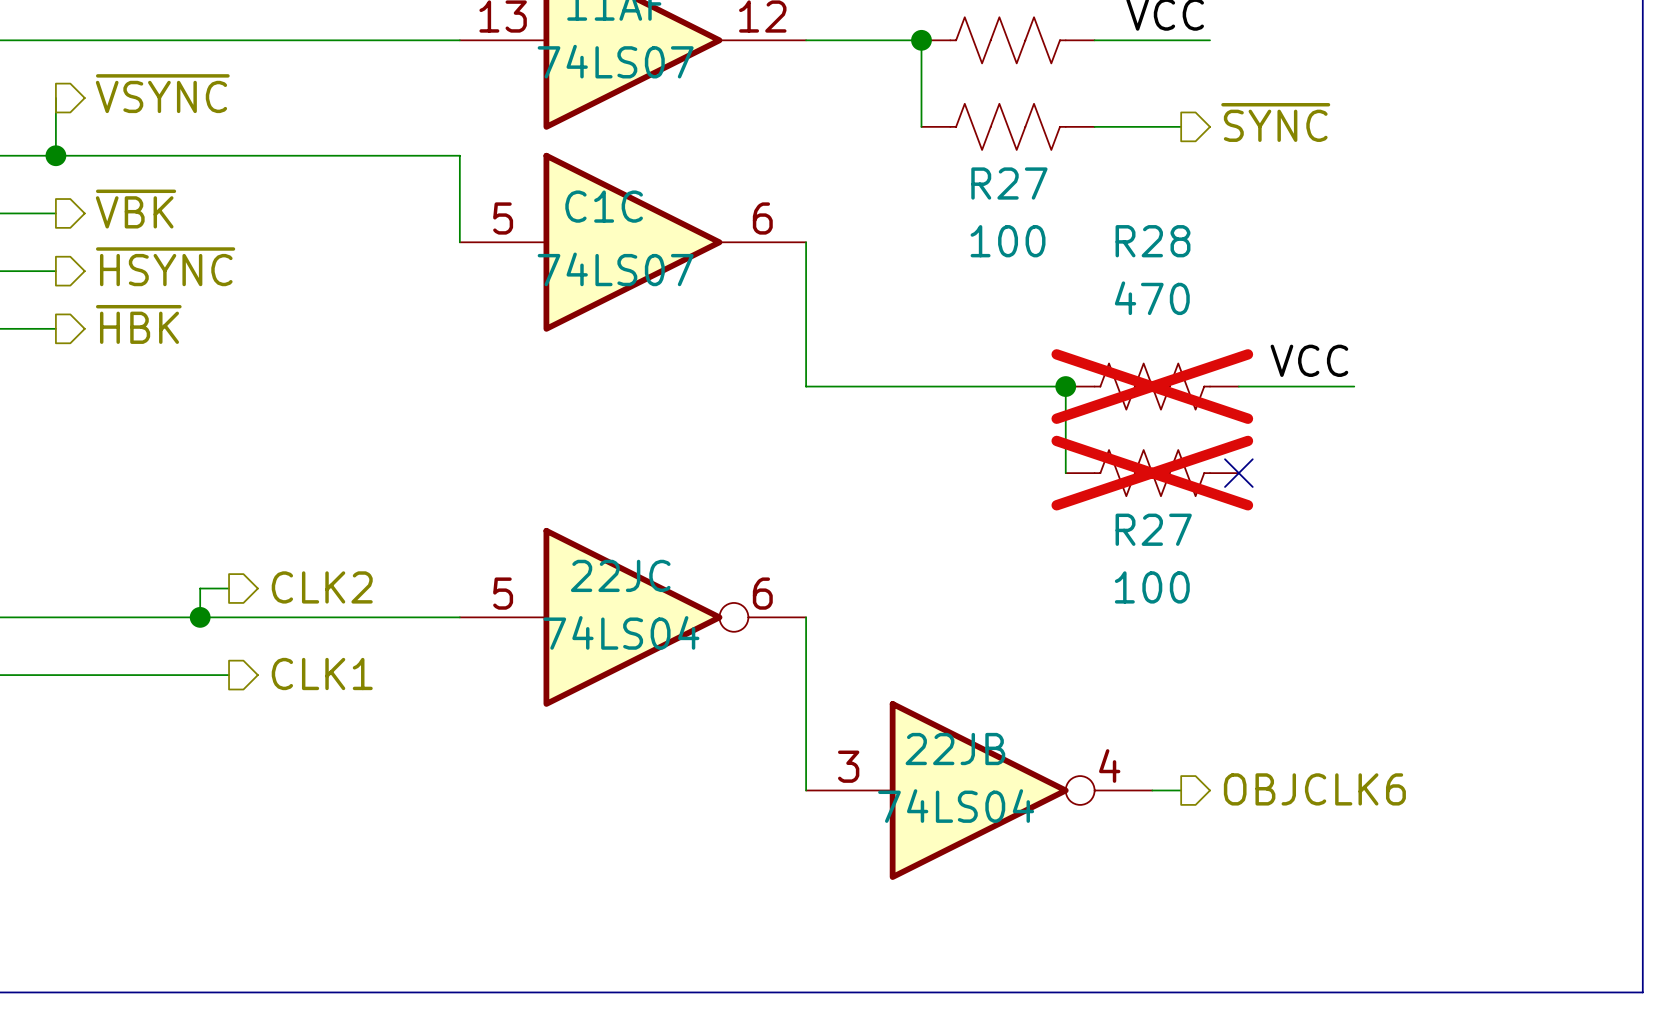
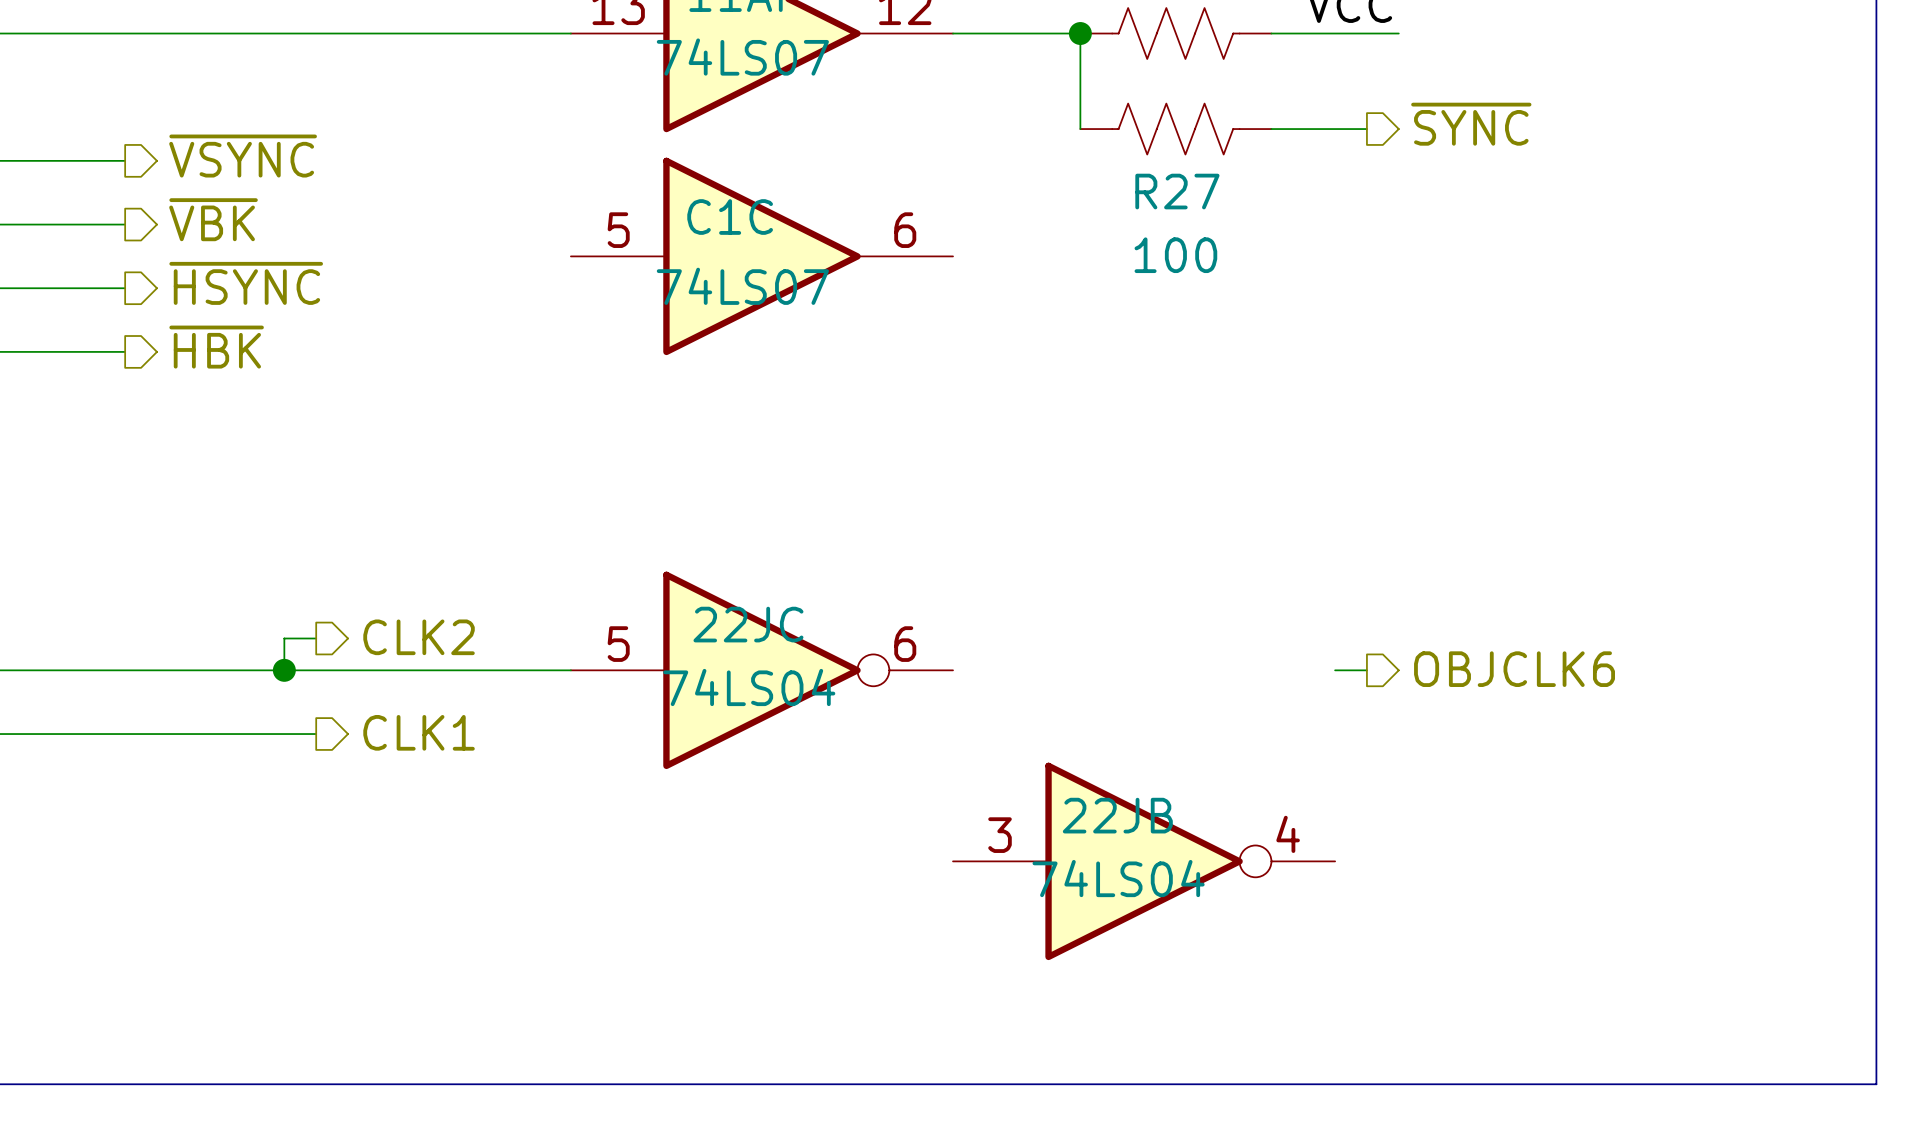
hierarchical label position: ~{VSYNC} (162, 93) -> ~{VSYNC} (243, 156)
wire: (55, 98) (55, 155) (459, 155) (459, 242) -> none
junction: (55, 155) -> none
wire: (806, 242) (806, 386) (1065, 386) (1065, 473) -> none
label: VCC (1309, 360) -> none
junction: (1065, 386) -> none
R28: 470 (1152, 386) -> none
wire: (1238, 386) (1354, 386) -> none
R27: 100 (1152, 473) -> none
no-connect mark: (1238, 473) -> none
wire: (806, 617) (806, 790) -> none
hierarchical label position: OBJCLK6 (1314, 789) -> OBJCLK6 (1514, 669)
wire: (1152, 790) (1181, 790) -> (1335, 670) (1366, 670)

